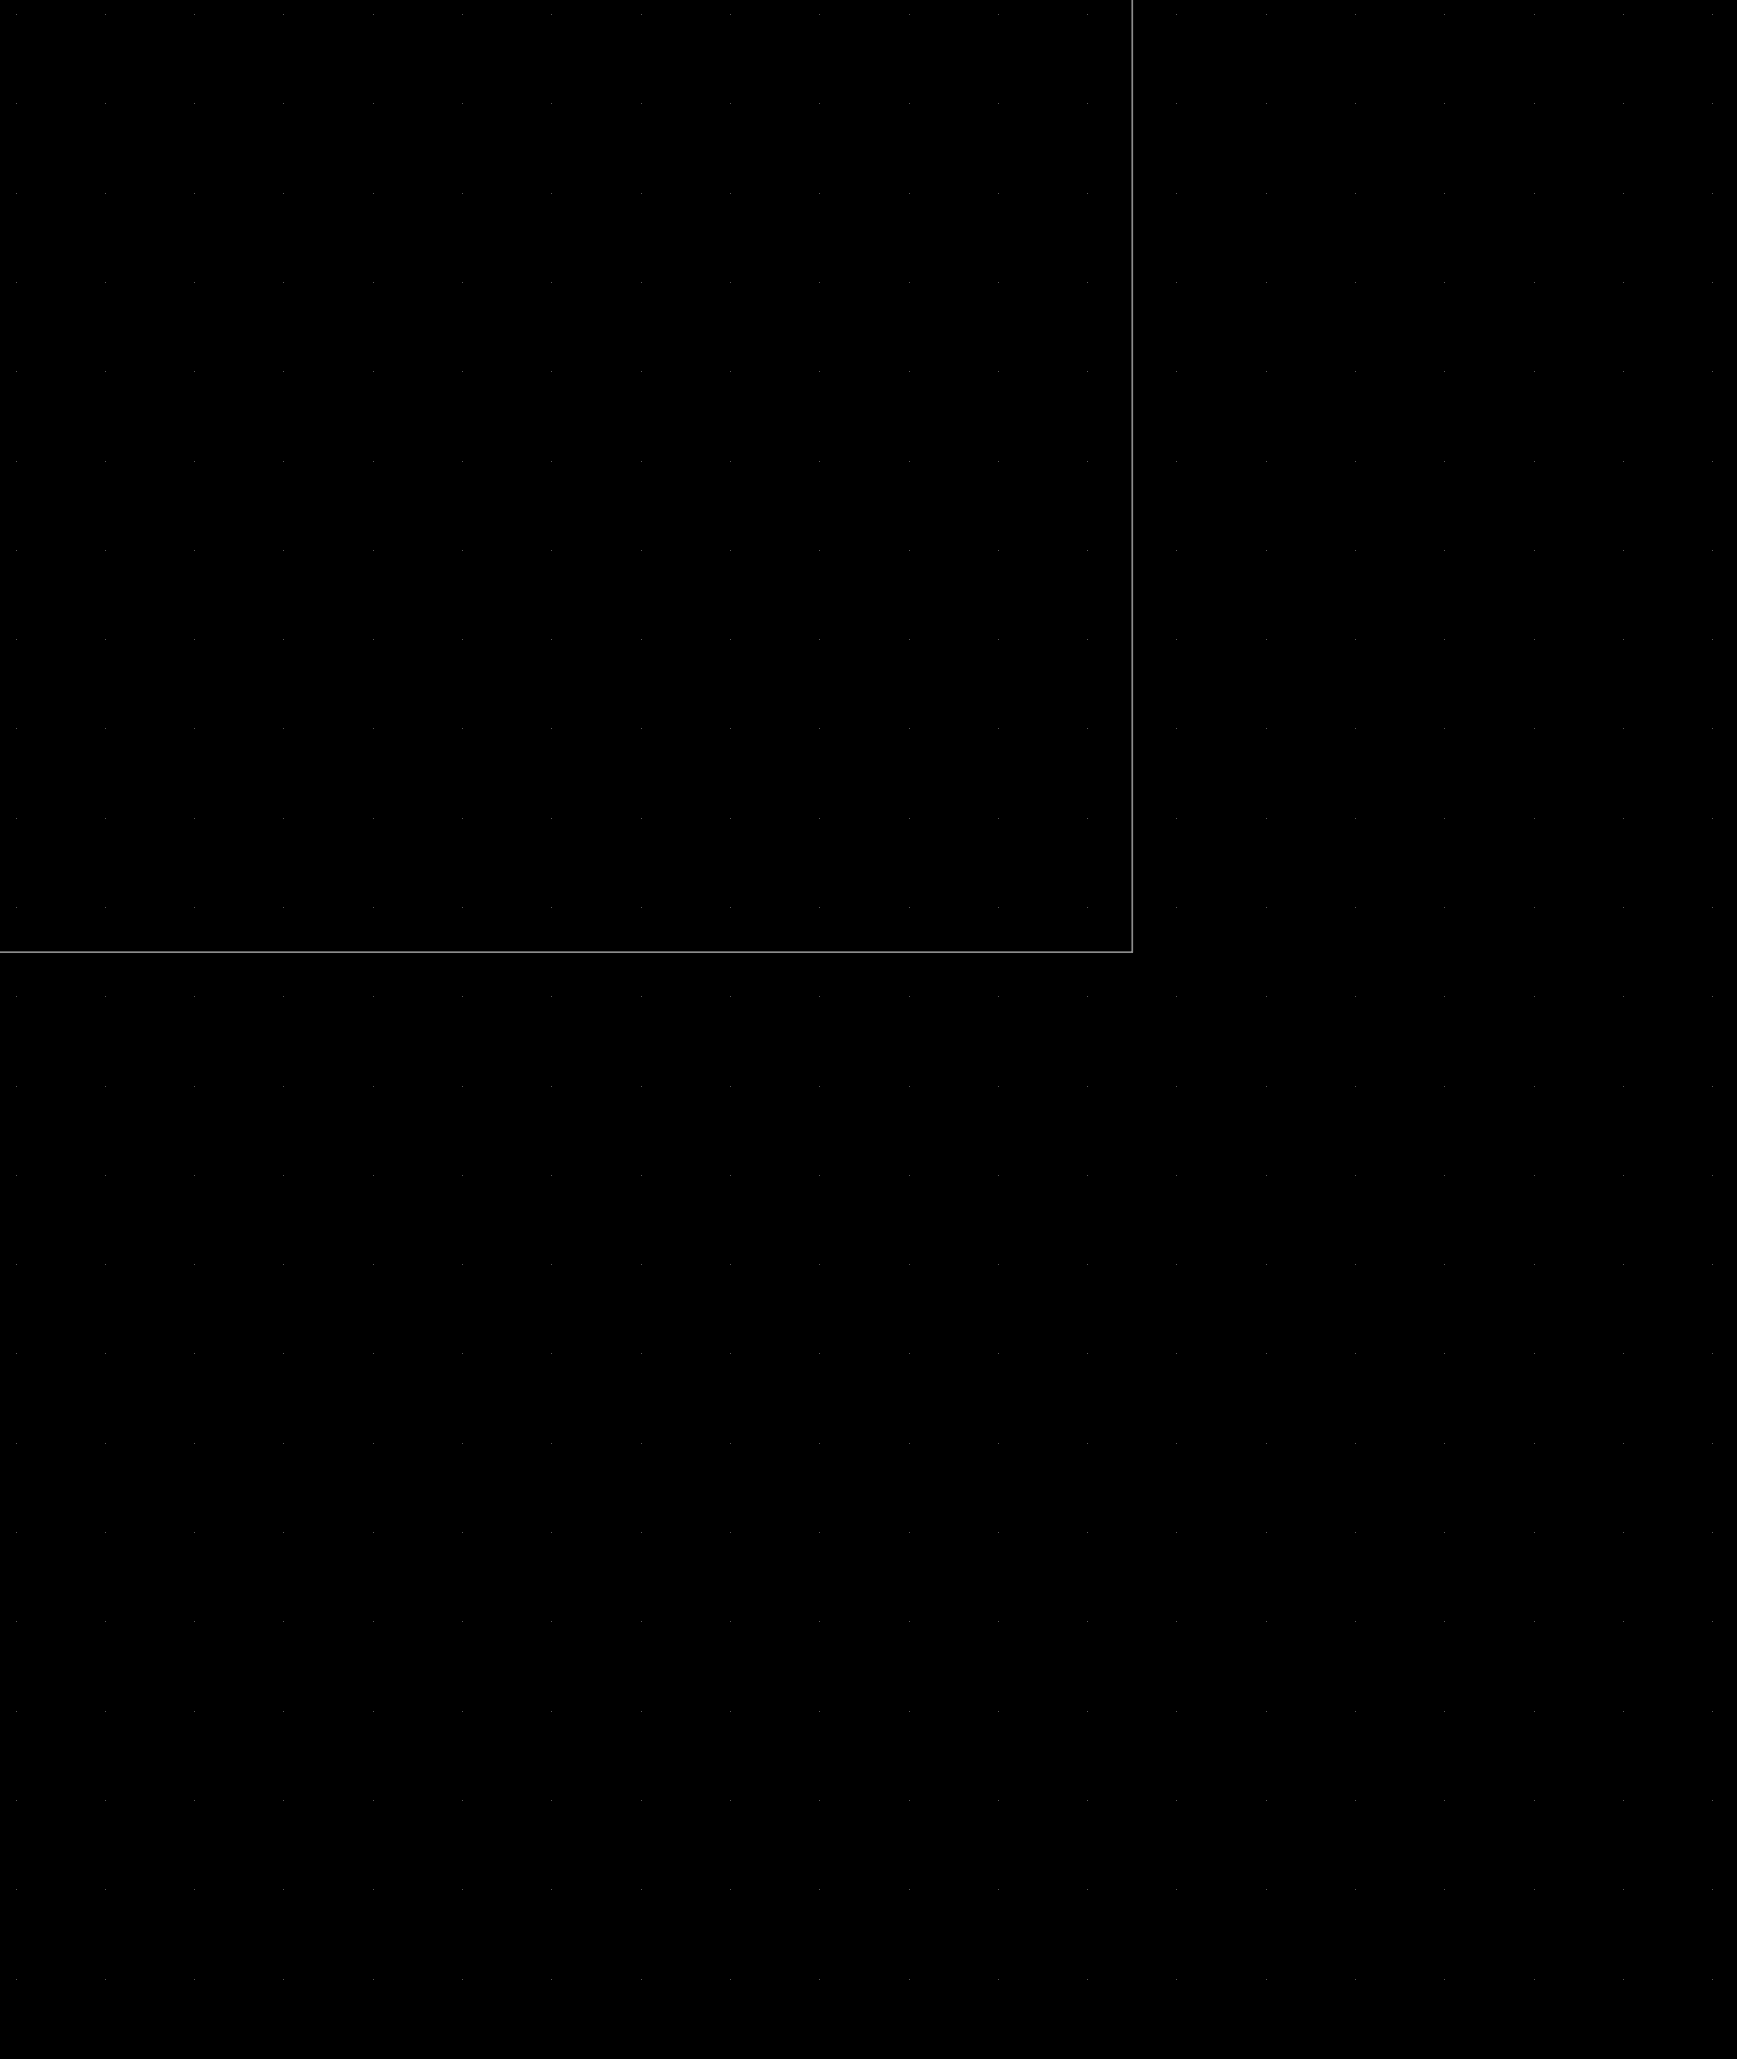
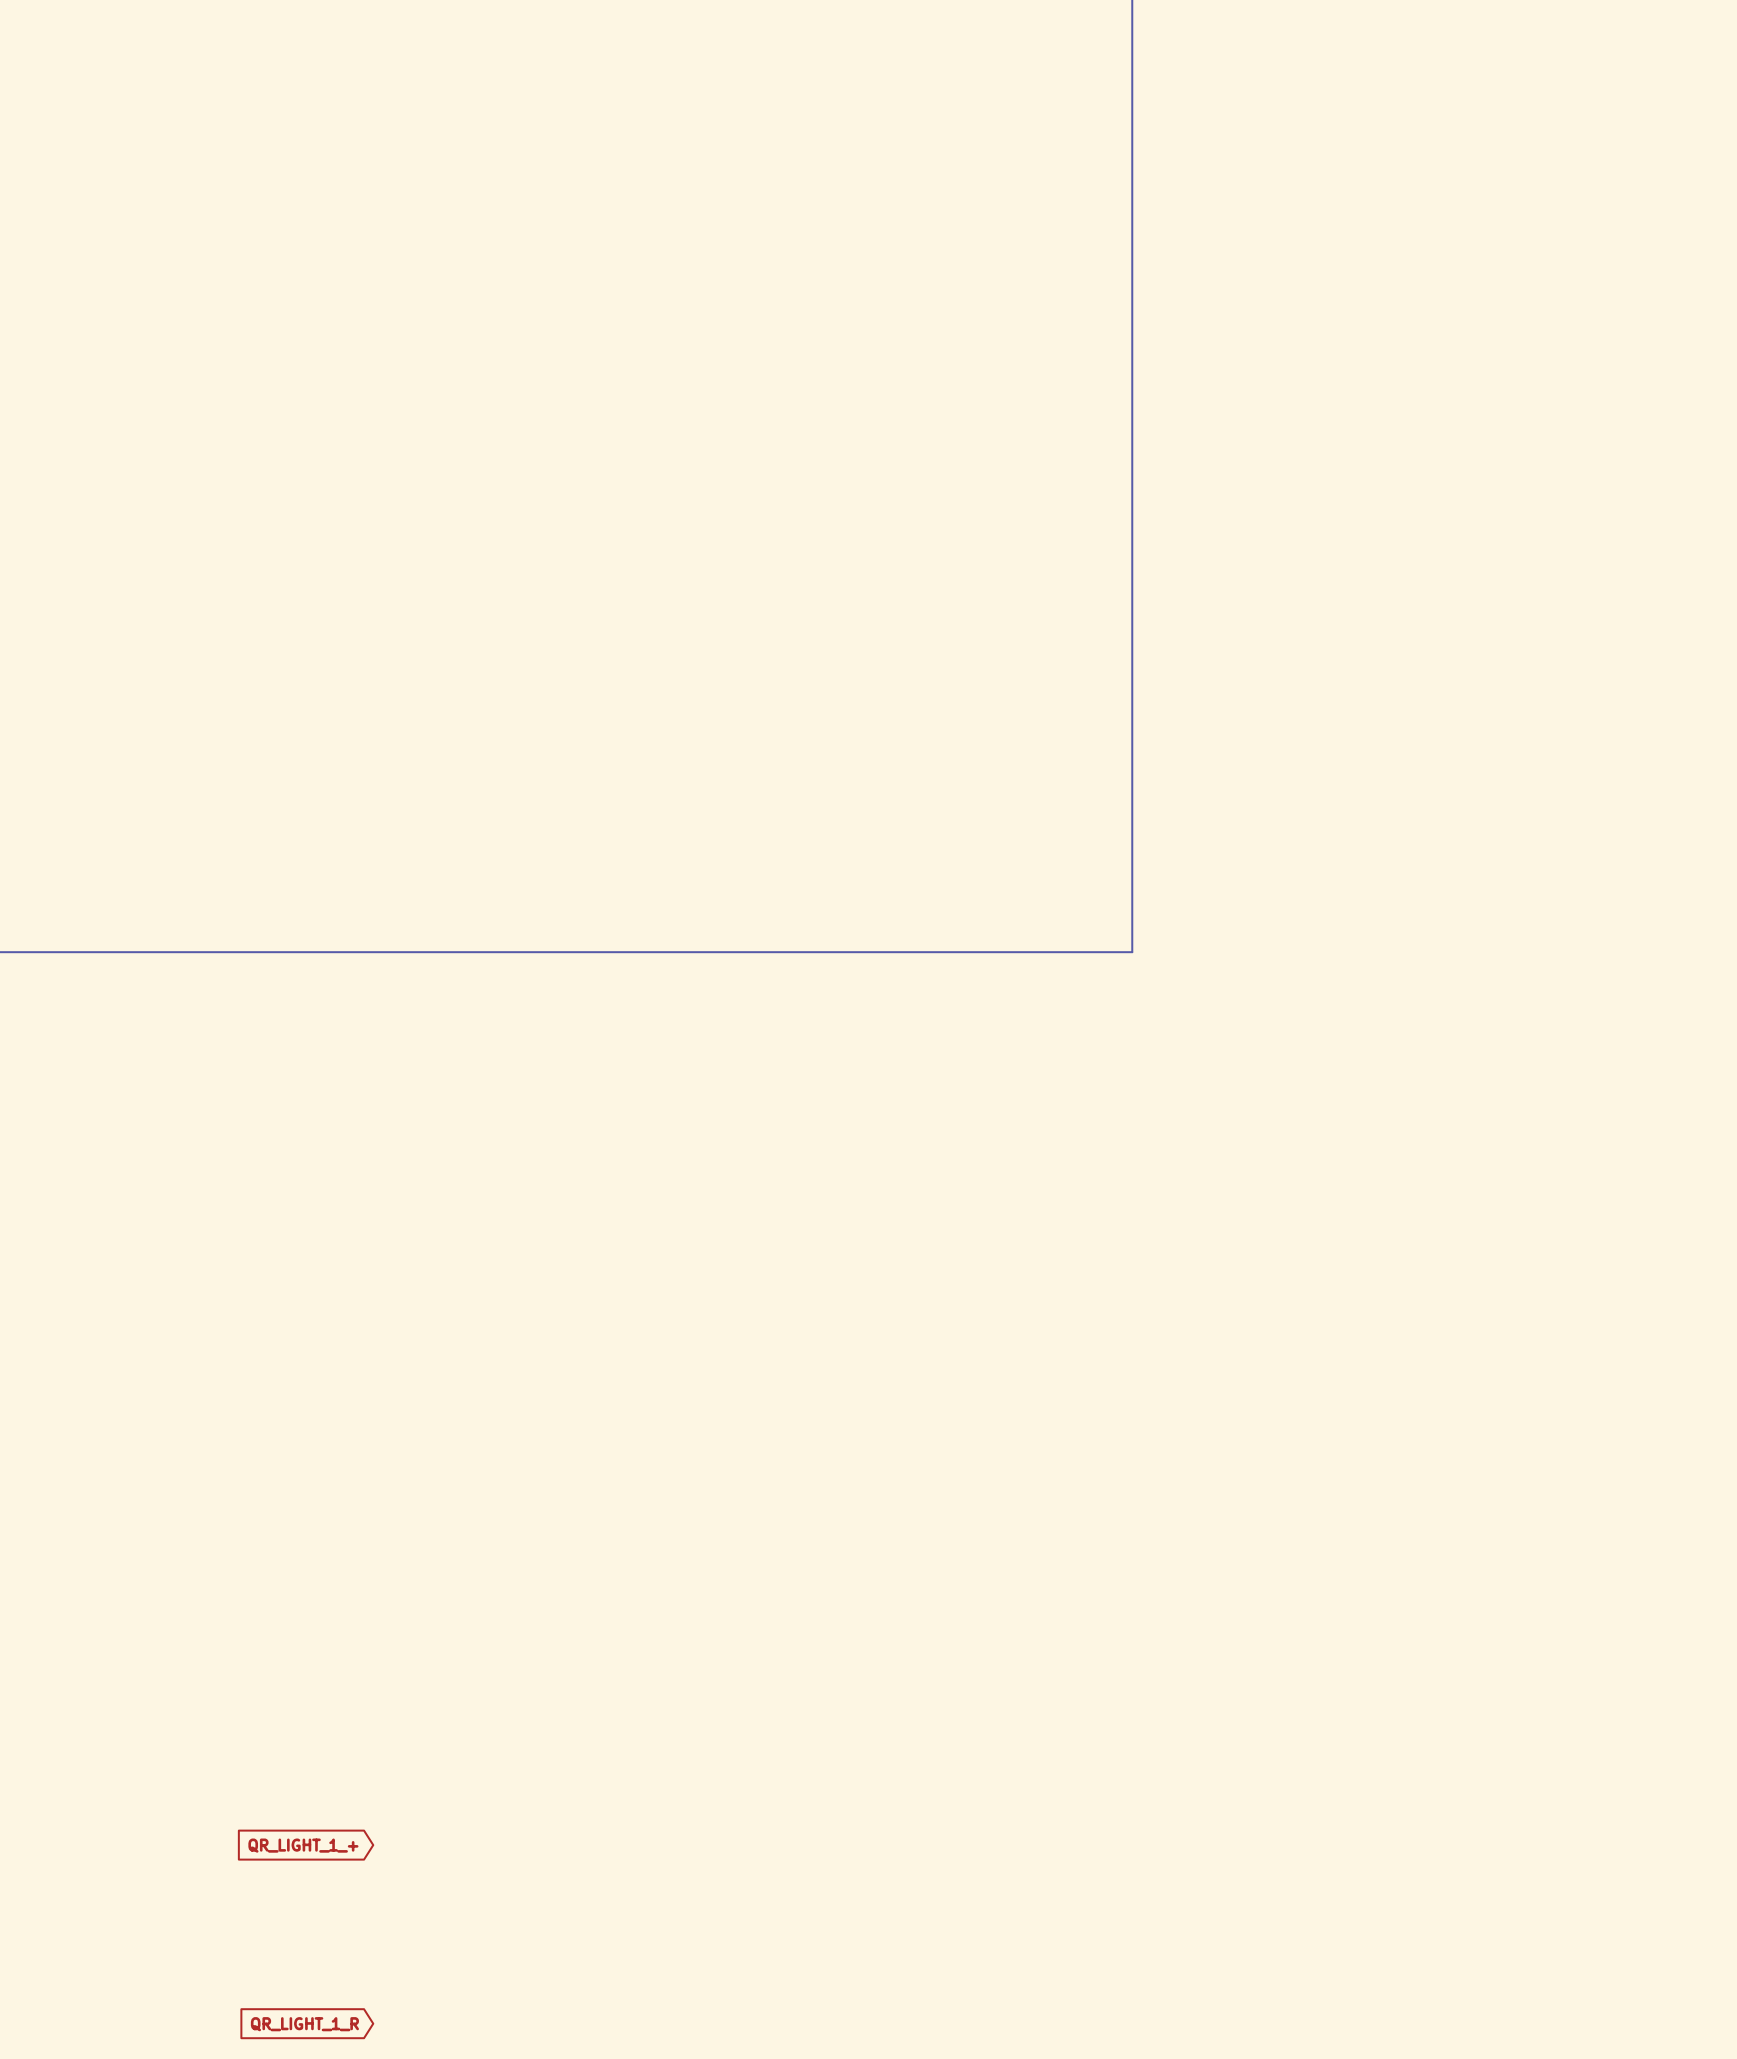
global label: none -> QR_LIGHT_1_+ (303, 1845)
global label: none -> QR_LIGHT_1_R (304, 2024)

